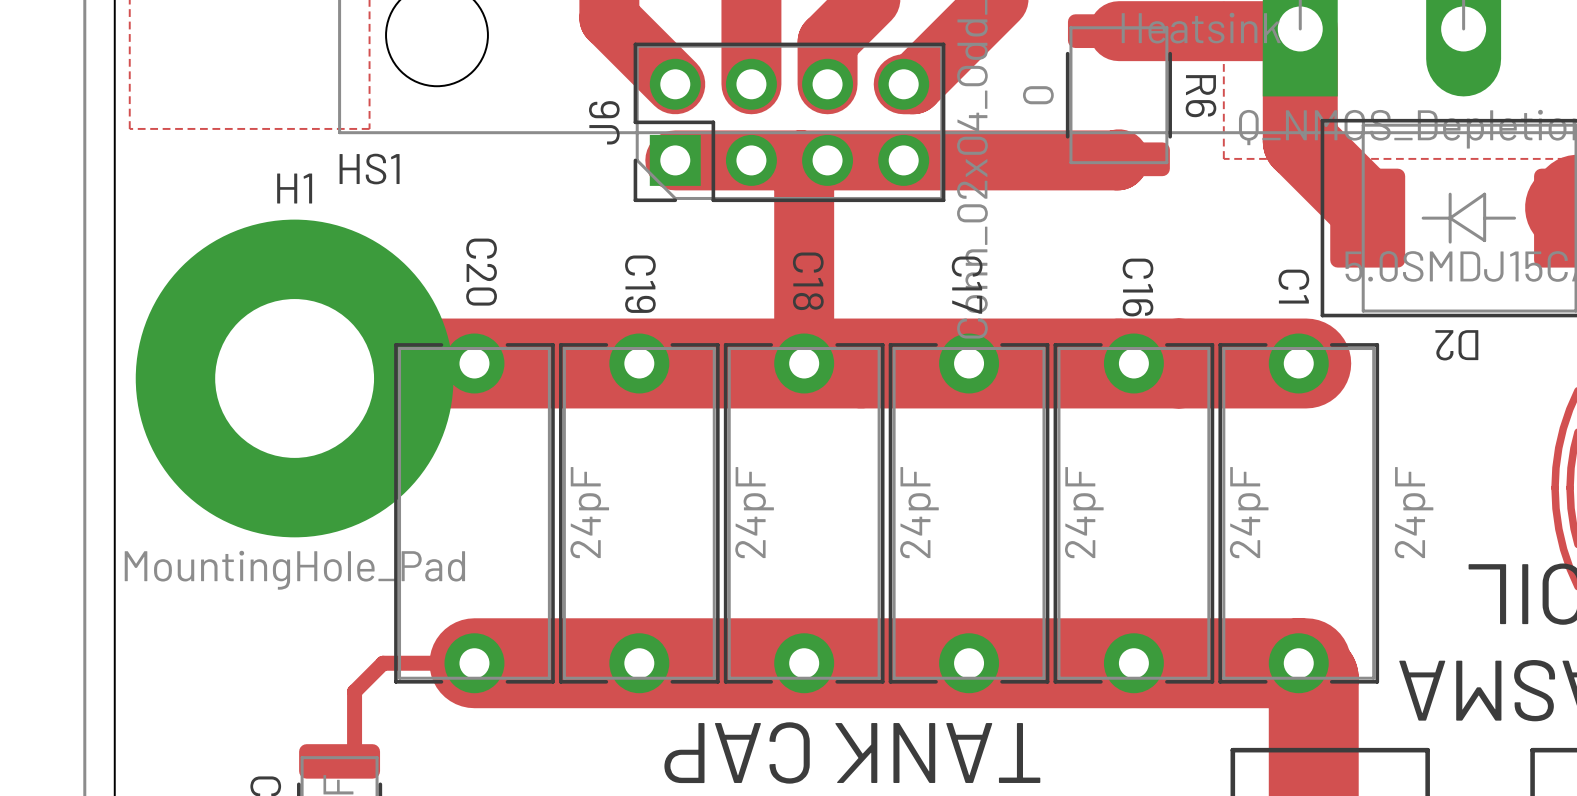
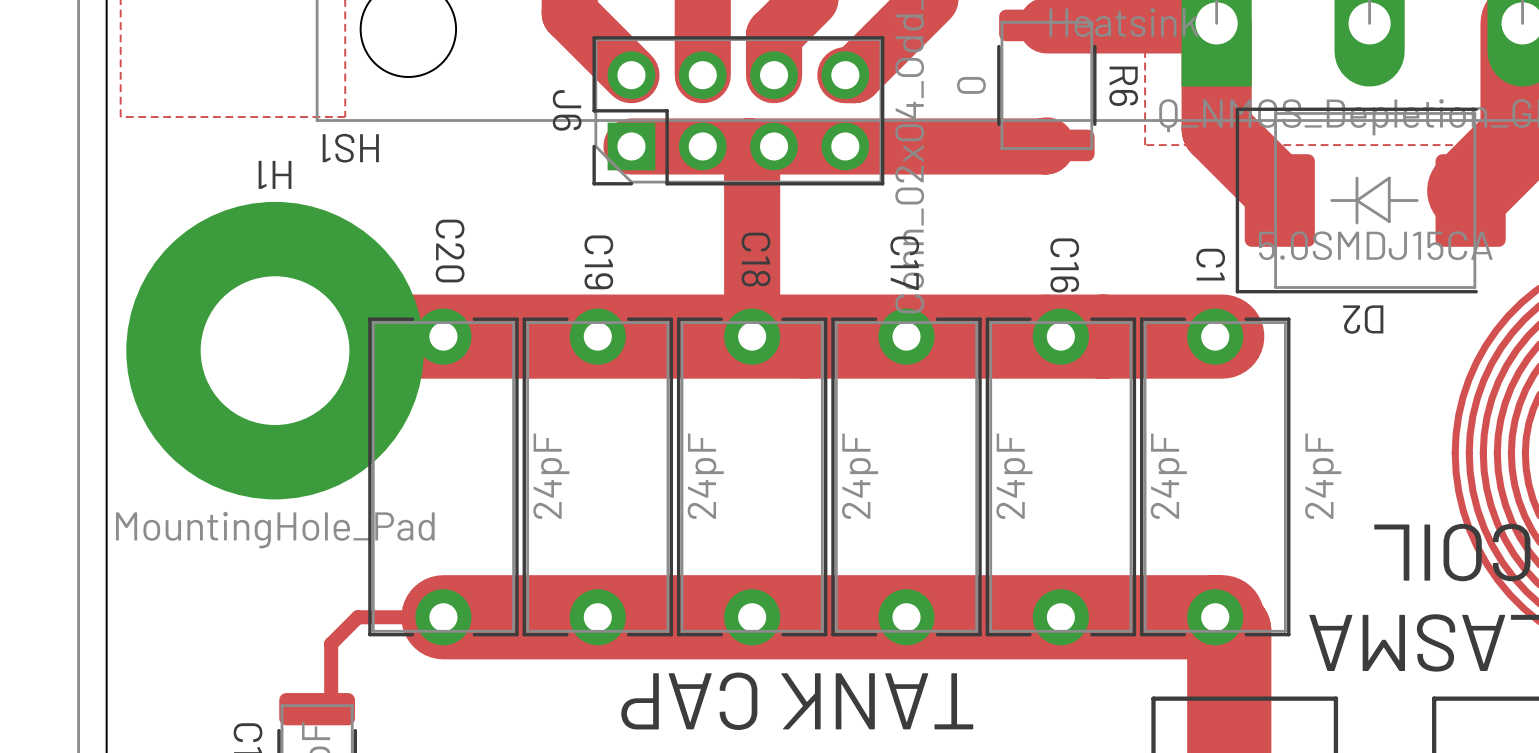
J6 name rotation: 0° (604, 122) -> 180° (567, 110)
HS1 name rotation: 0° (369, 169) -> 180° (350, 148)
H1 name rotation: 0° (294, 188) -> 180° (275, 174)

